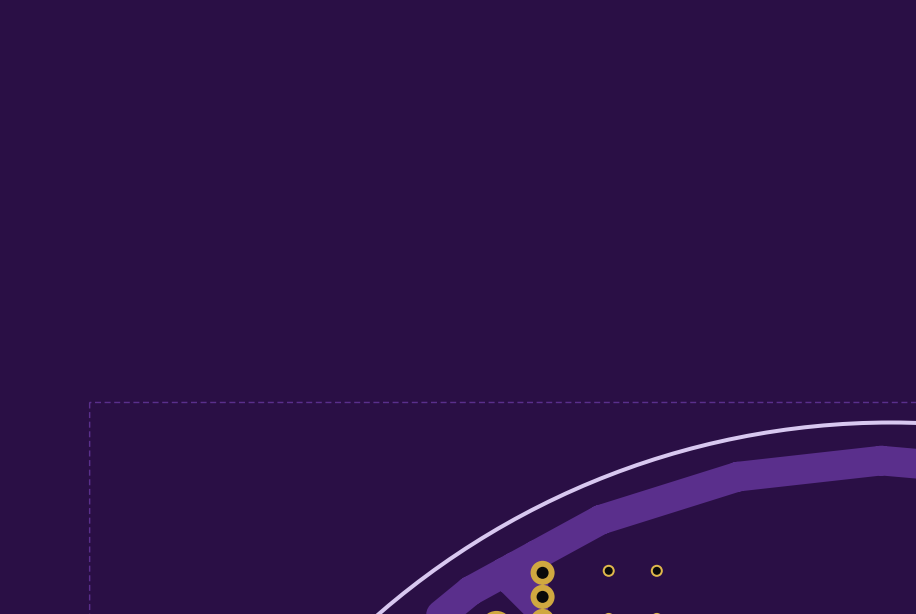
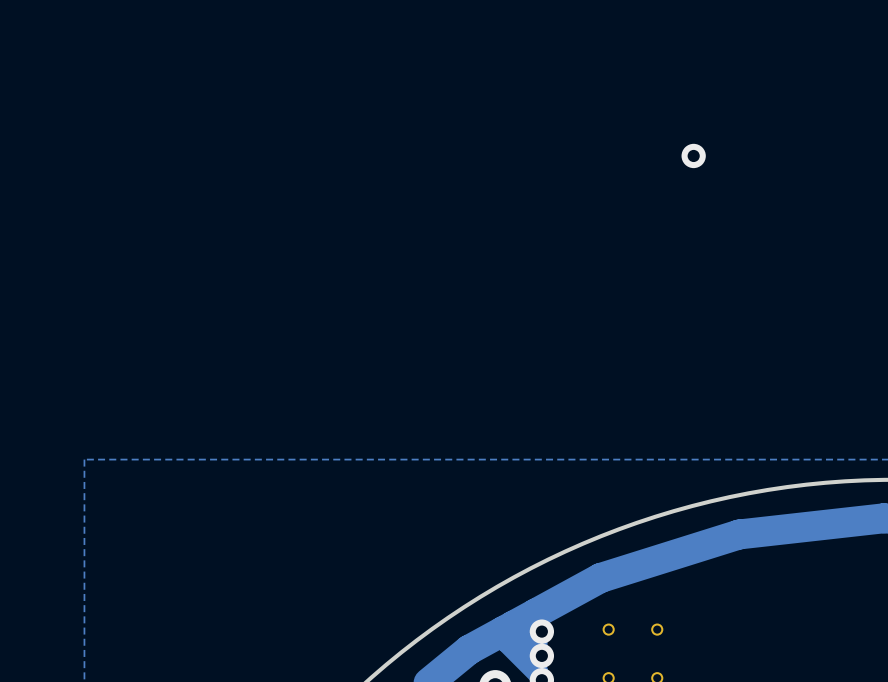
via: none -> (693, 155)

